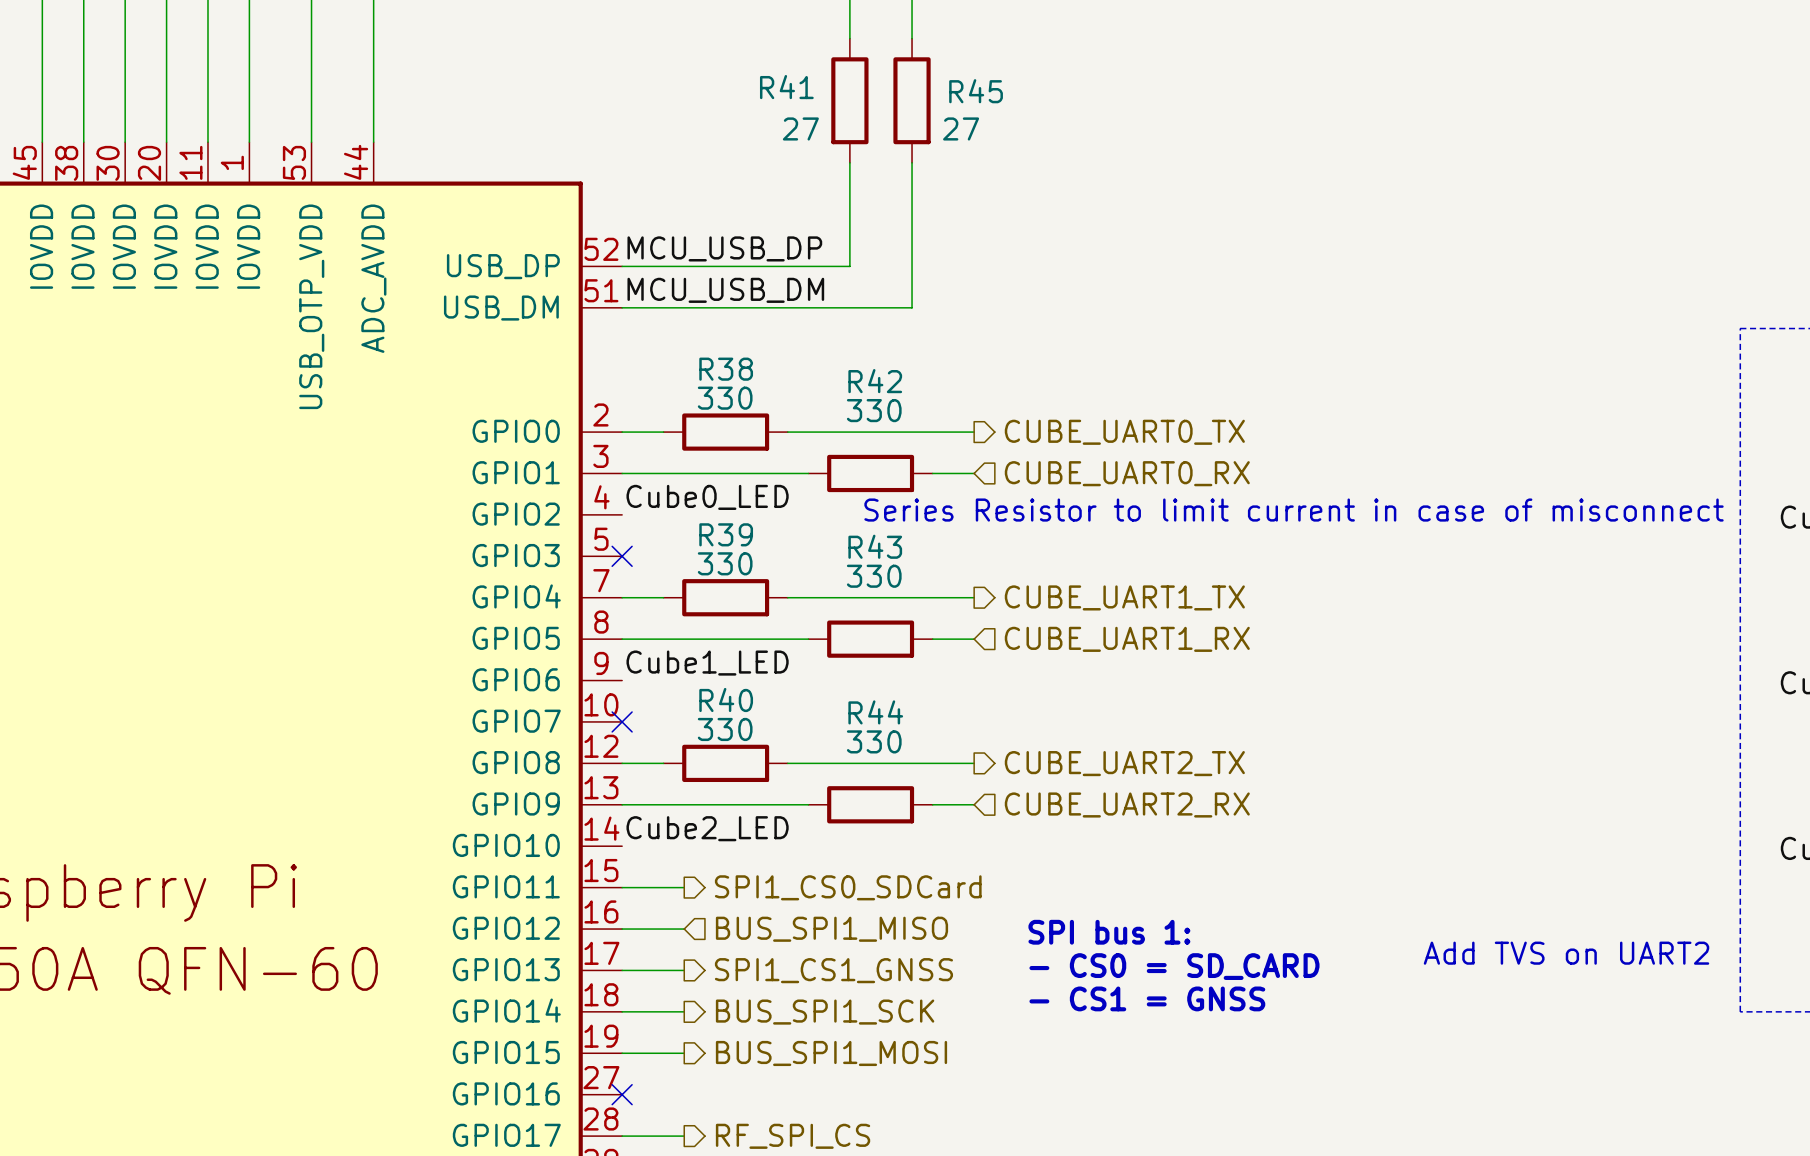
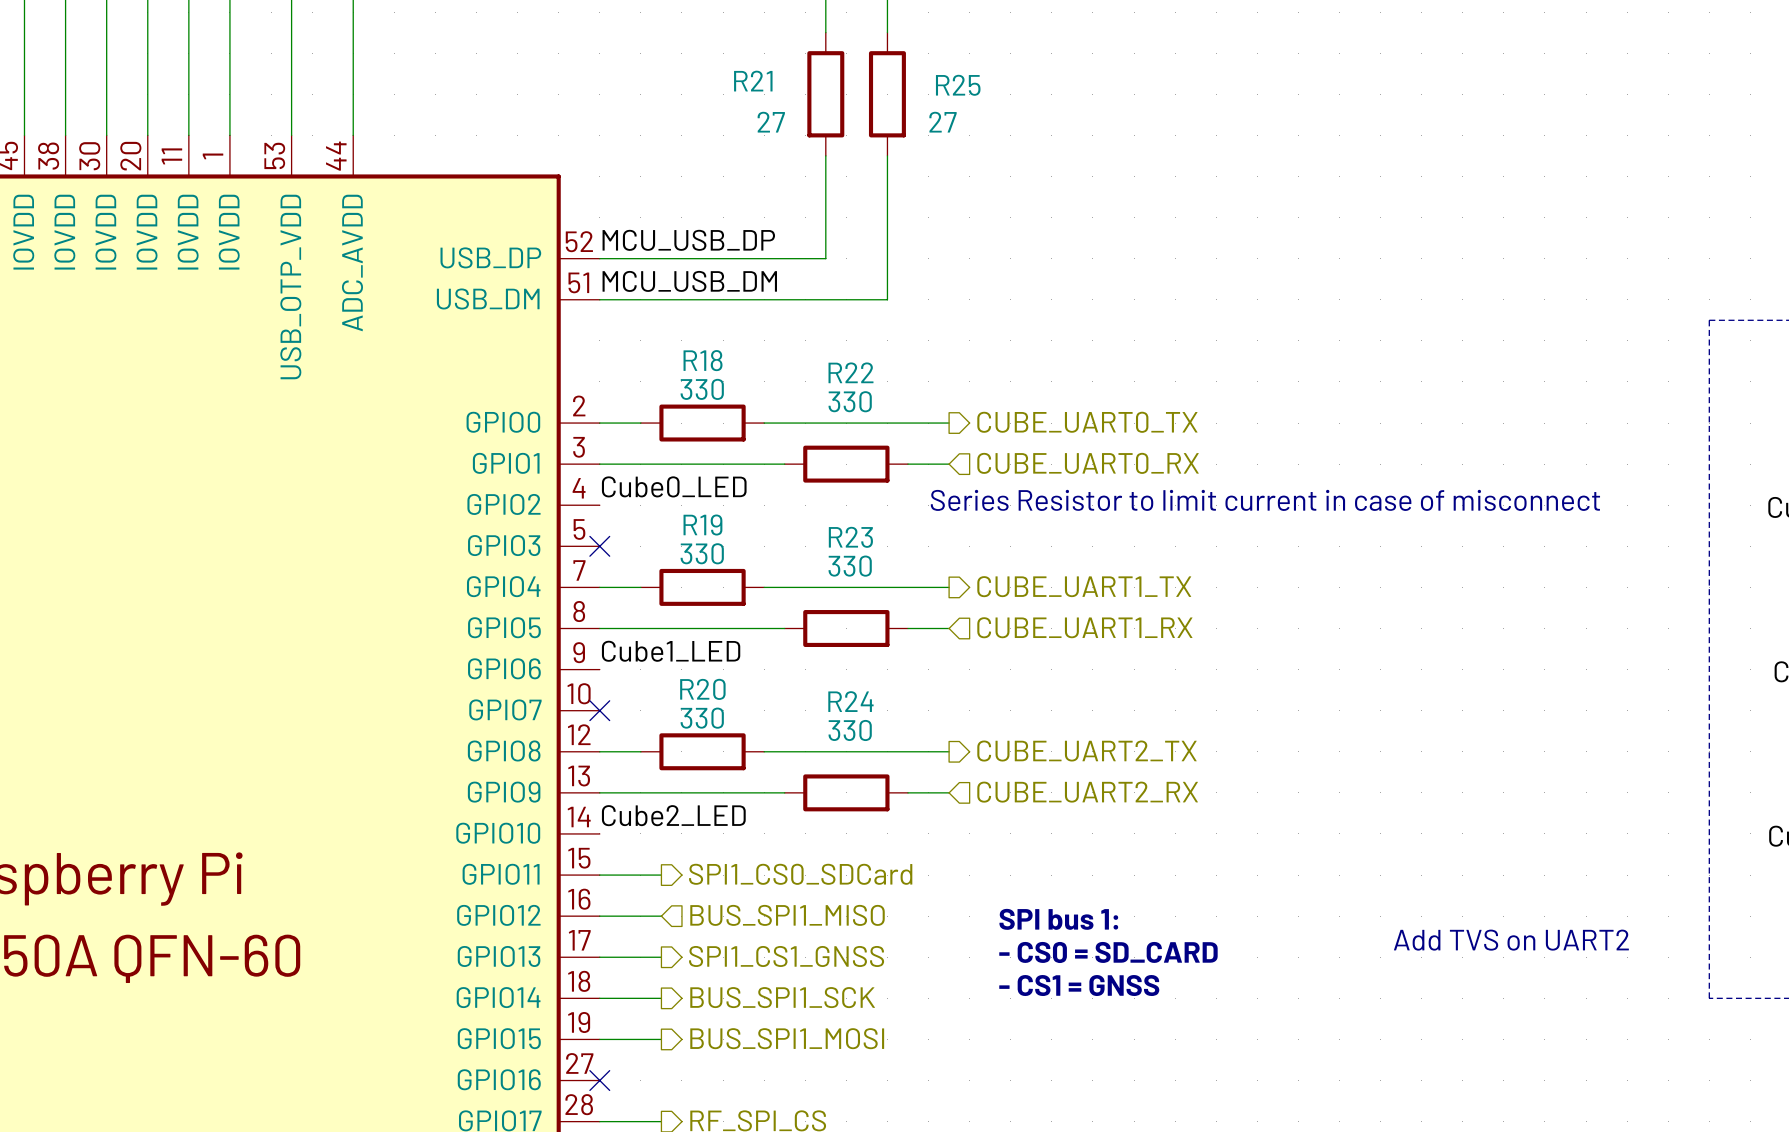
R41 name: R41 (786, 87) -> R21 (753, 81)
R45 name: R45 (976, 91) -> R25 (958, 85)
R38 name: R38 (726, 369) -> R18 (703, 360)
R42 name: R42 (875, 381) -> R22 (850, 372)
R39 name: R39 (726, 534) -> R19 (702, 525)
R43 name: R43 (875, 546) -> R23 (850, 537)
R40 name: R40 (726, 699) -> R20 (702, 689)
R44 name: R44 (875, 712) -> R24 (850, 701)

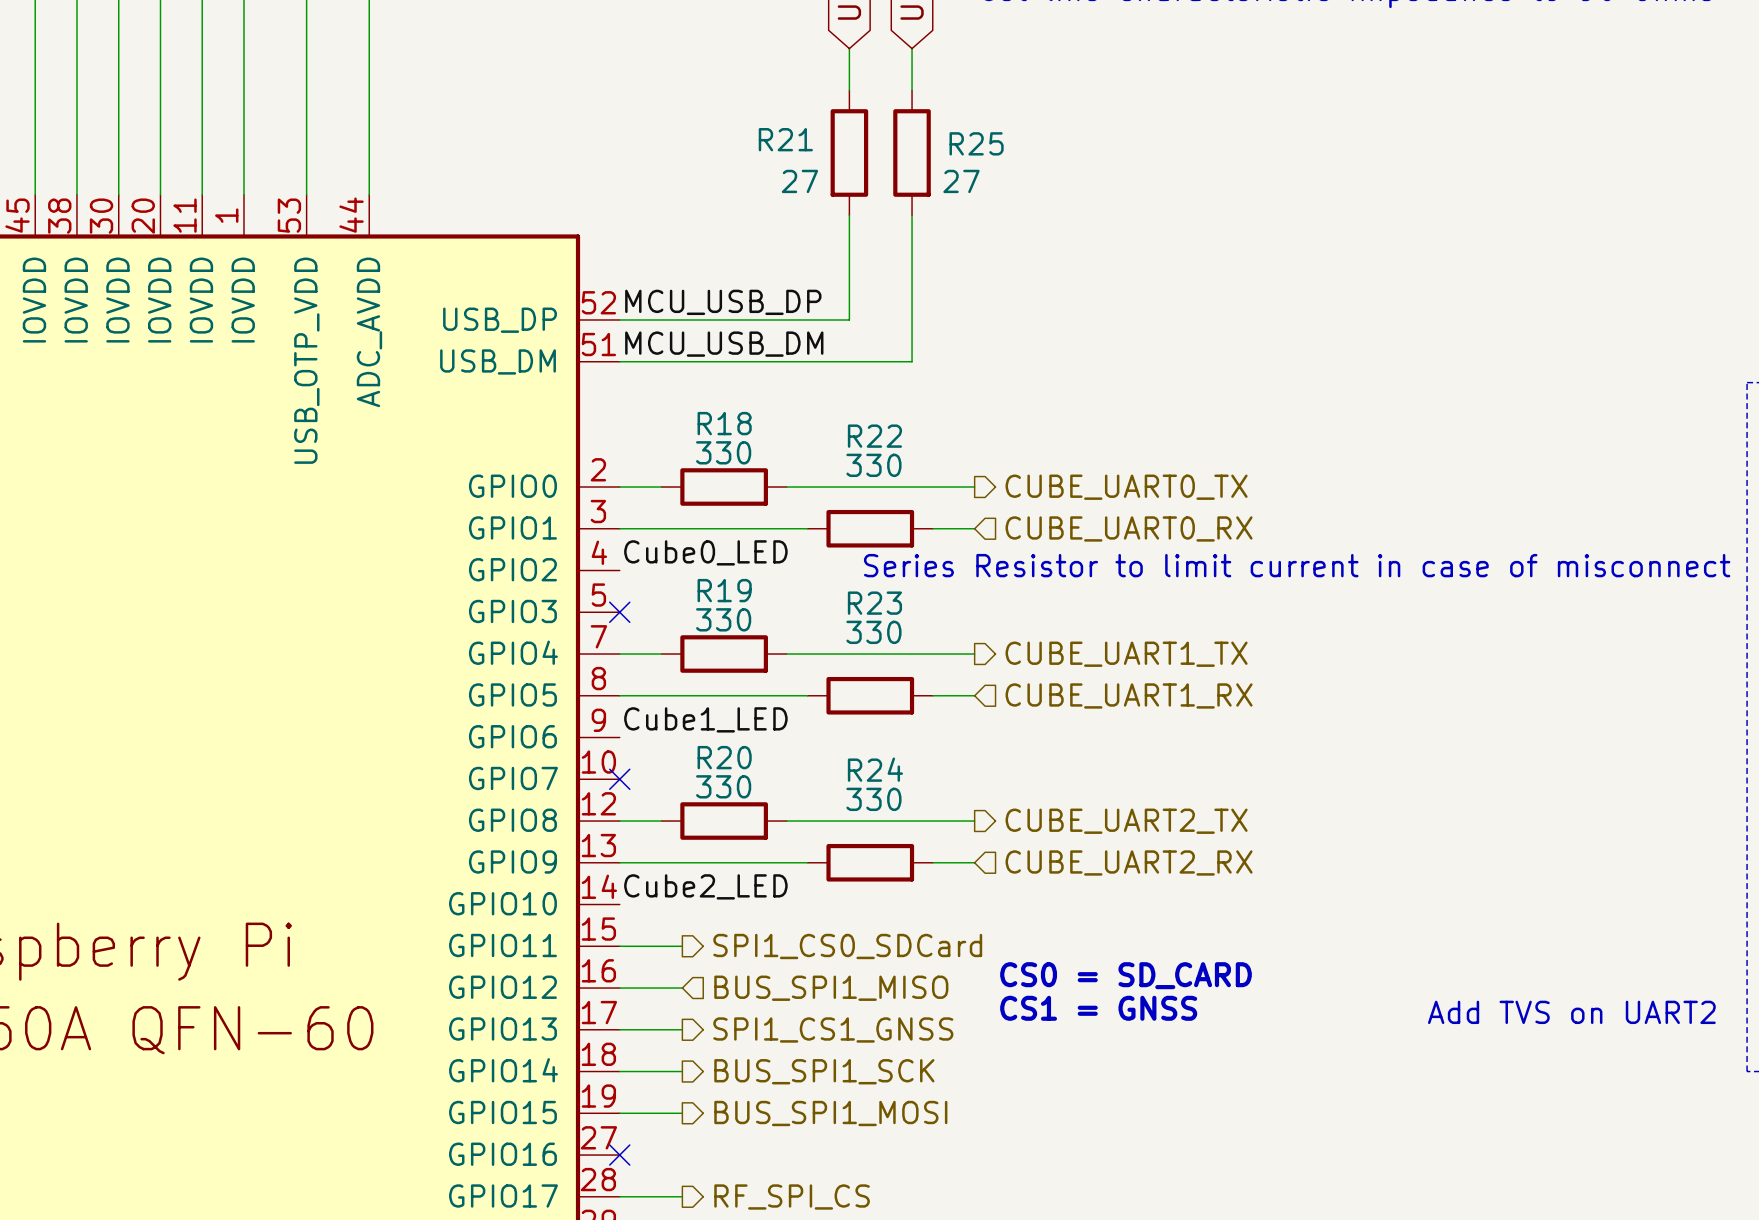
text: none -> CS0 = SD_CARD (1126, 975)
text: SPI bus 1: (1058, 919) -> none
text: none -> CS1 = GNSS (1098, 1008)
text: - CS0 = SD_CARD (1108, 952) -> none
text: - CS1 = GNSS (1079, 985) -> none

